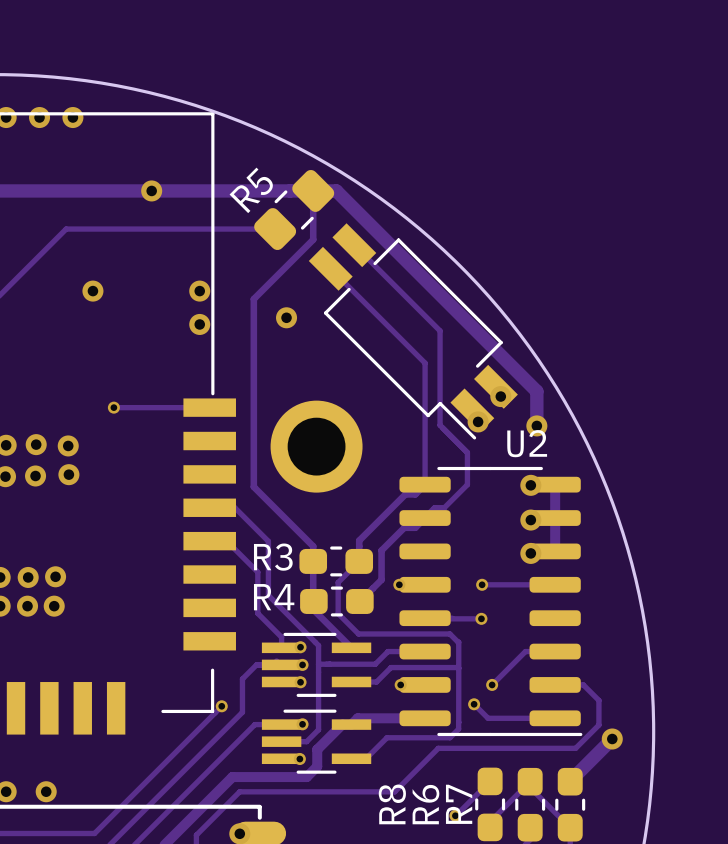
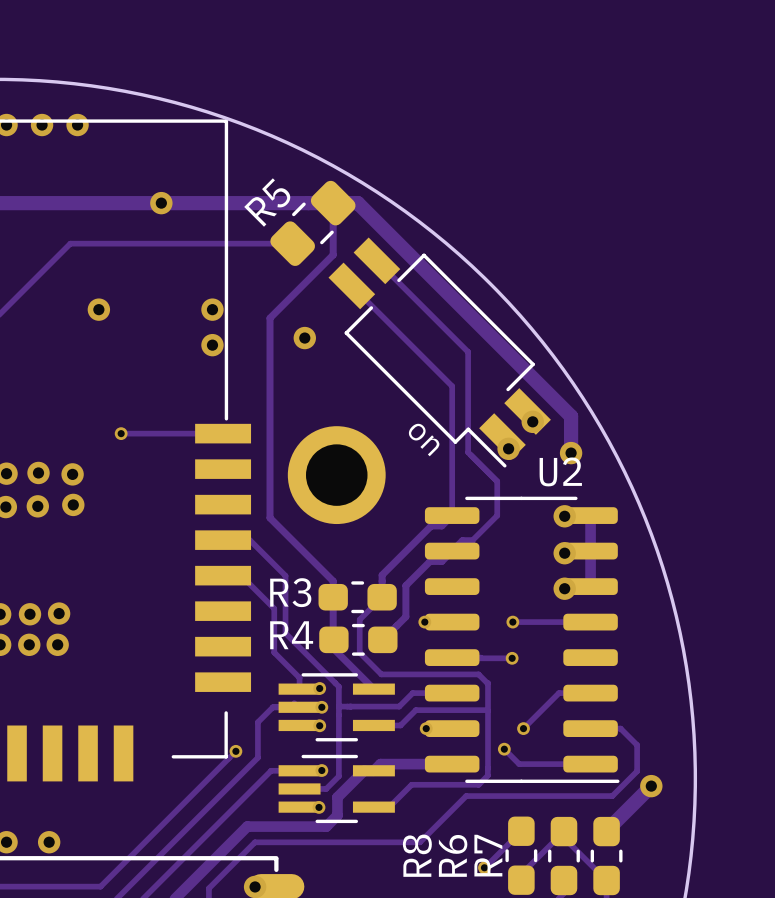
part text: none -> on (424, 439)

